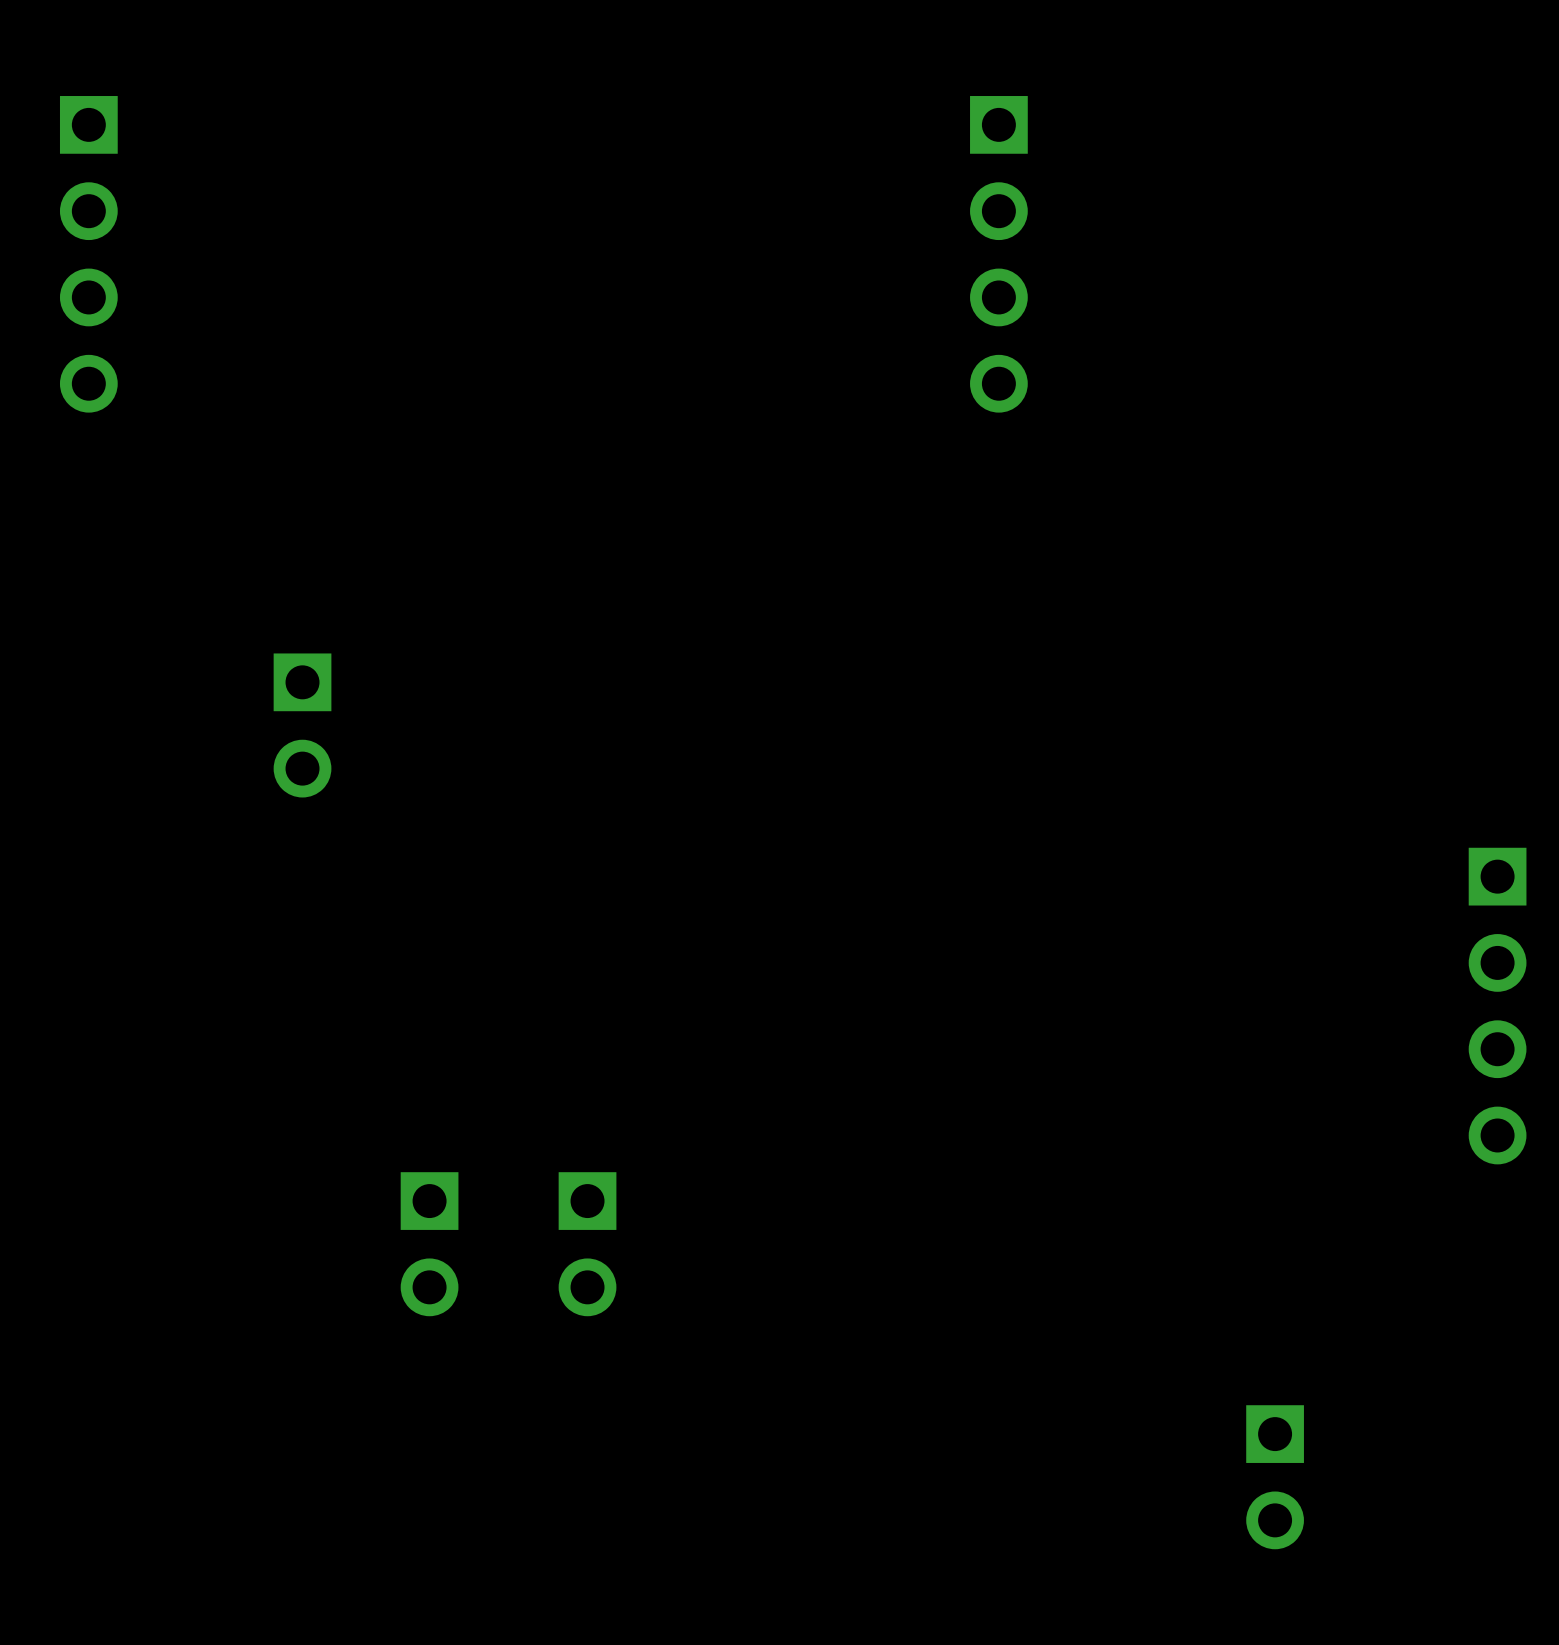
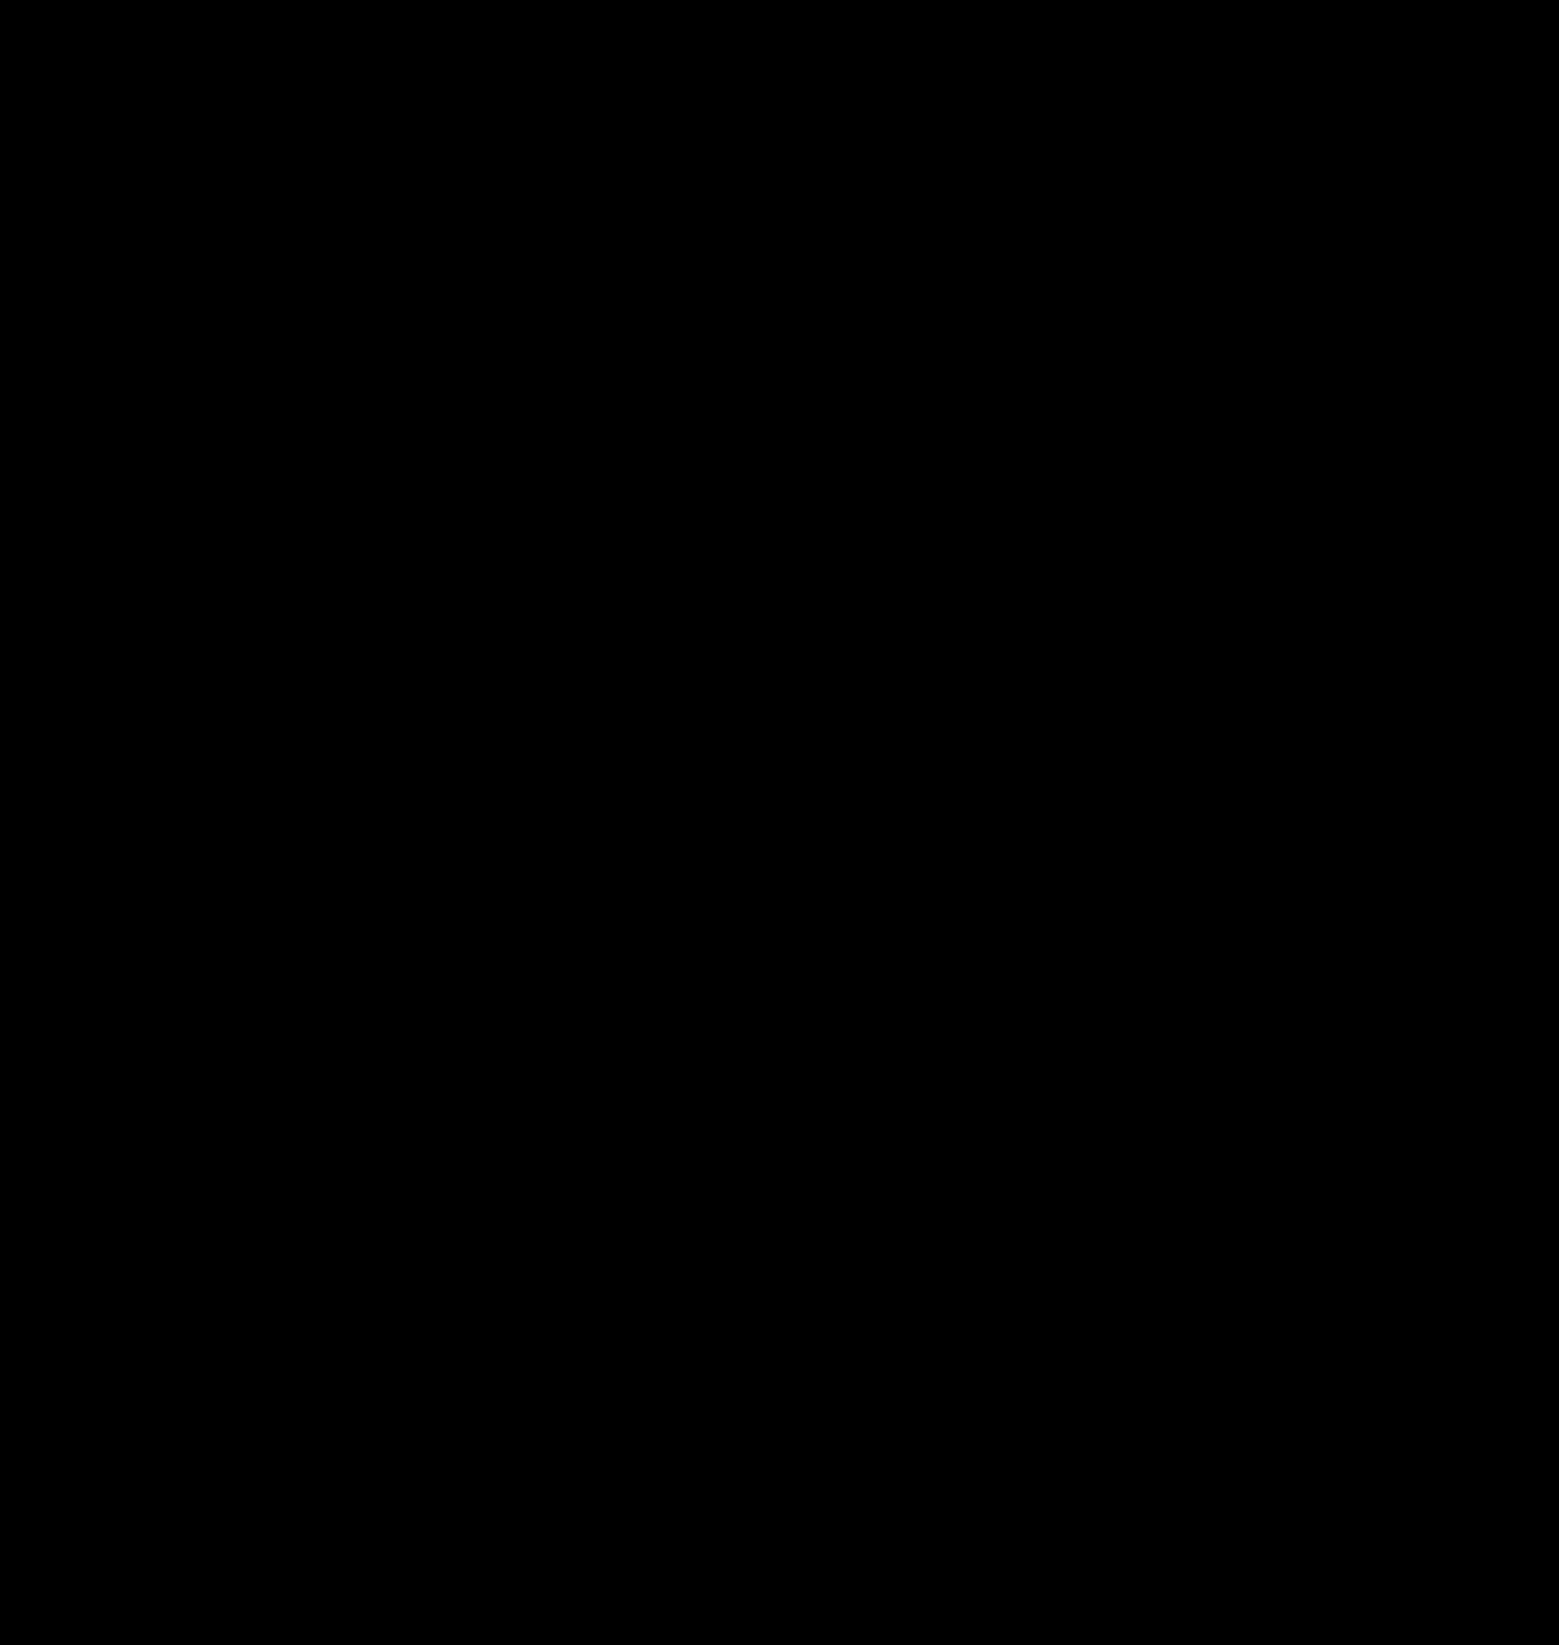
part: (88, 254) -> none
part: (998, 254) -> none
part: (302, 725) -> none
part: (1497, 1006) -> none
part: (429, 1244) -> none
part: (587, 1244) -> none
part: (1275, 1477) -> none

